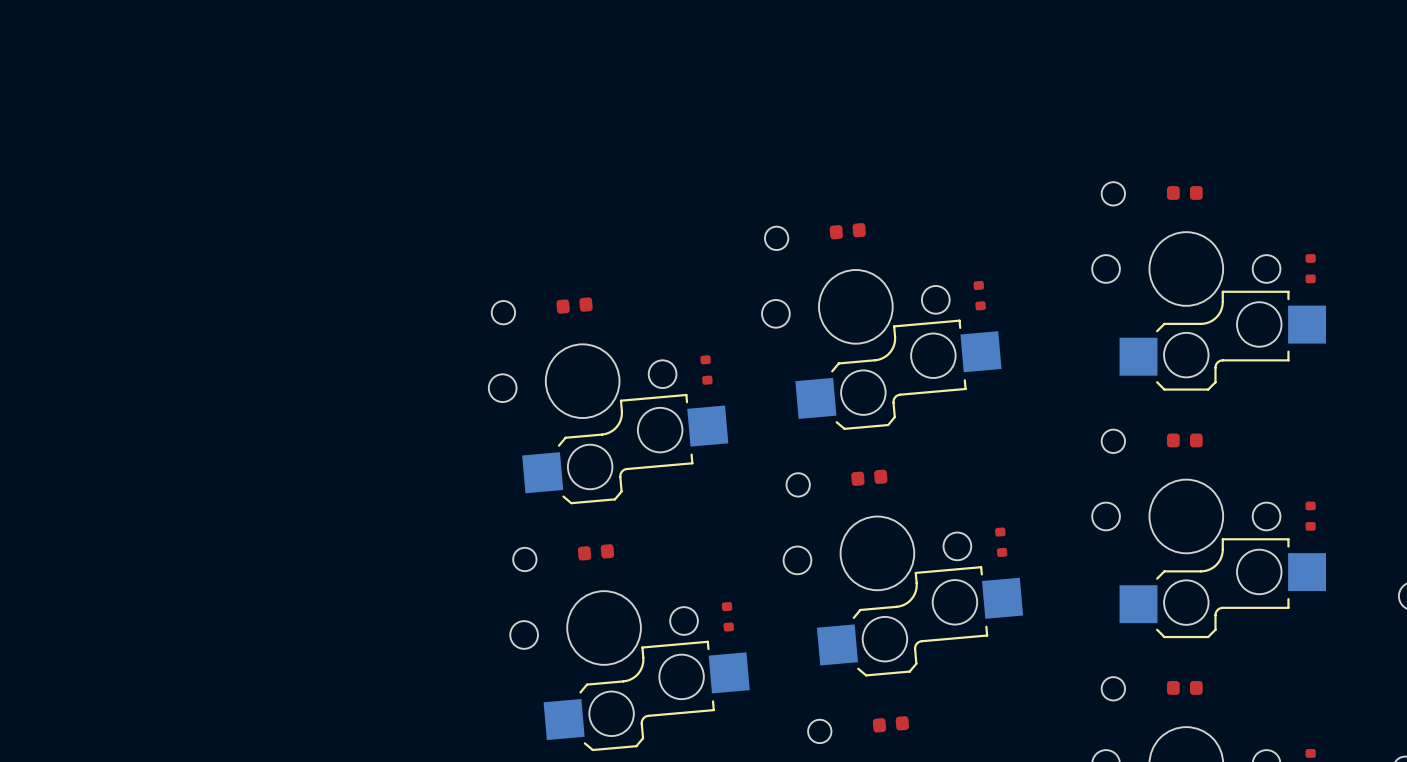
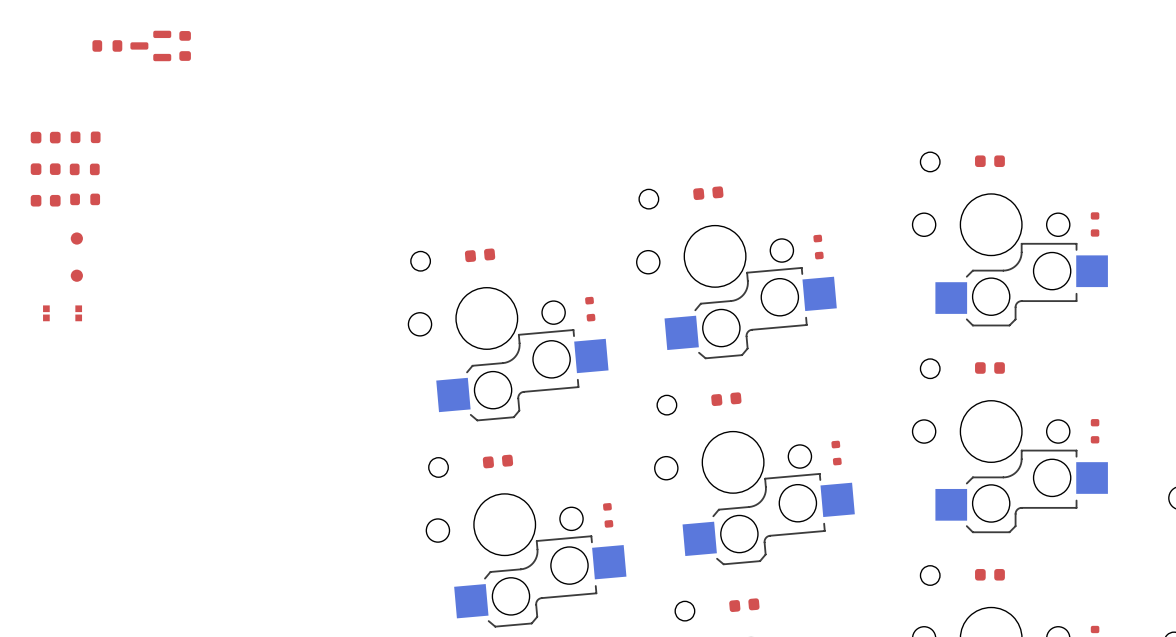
part: none -> (107, 45)
part: none -> (150, 45)
part: none -> (185, 45)
part: none -> (45, 137)
part: none -> (85, 137)
part: none -> (45, 169)
part: none -> (84, 169)
part: none -> (85, 199)
part: none -> (45, 200)
part: none -> (76, 238)
part: none -> (76, 275)
part: none -> (62, 313)

